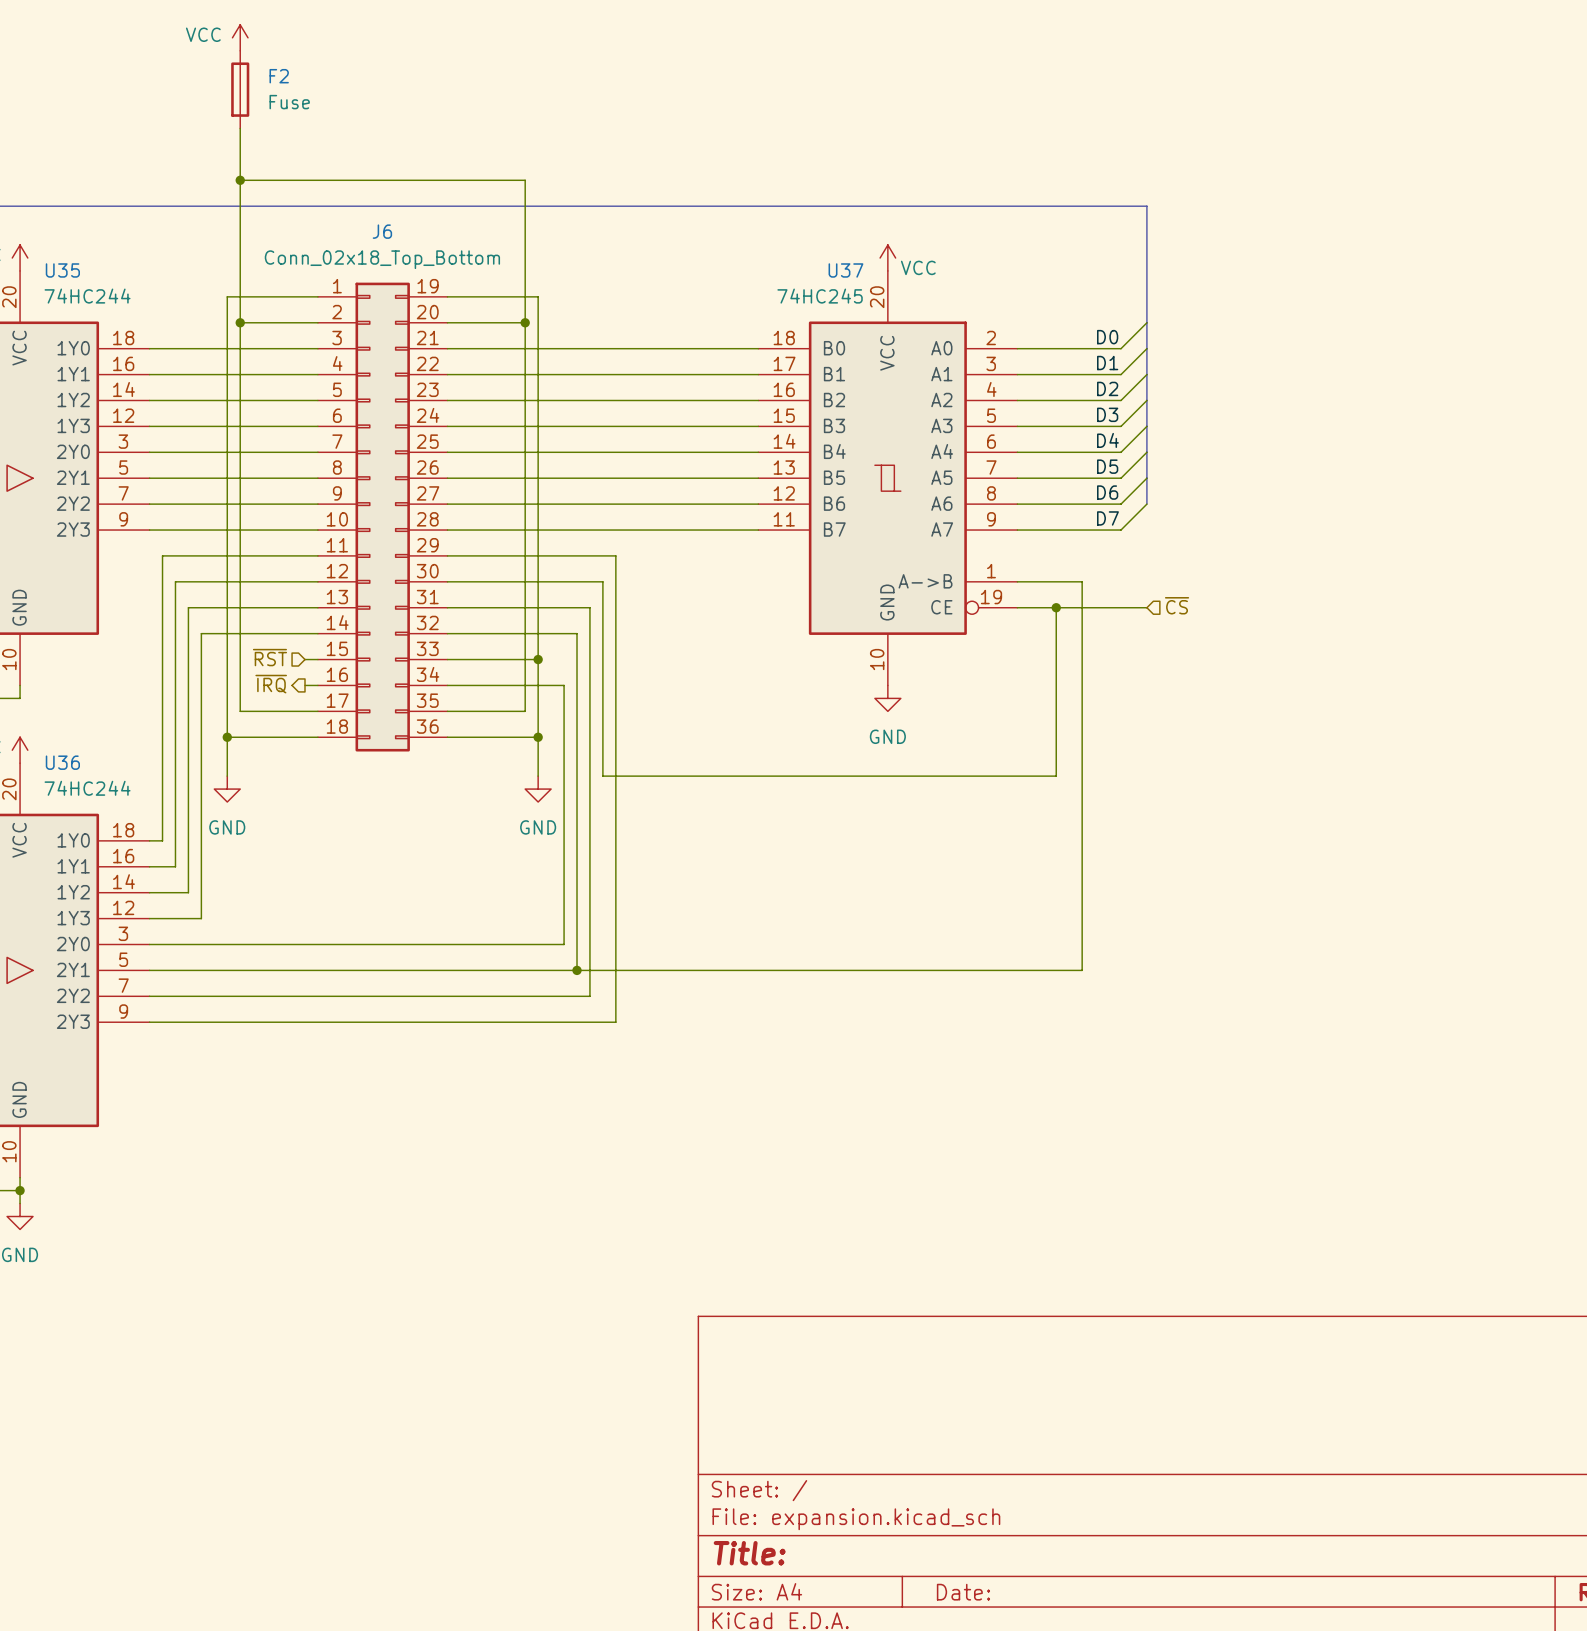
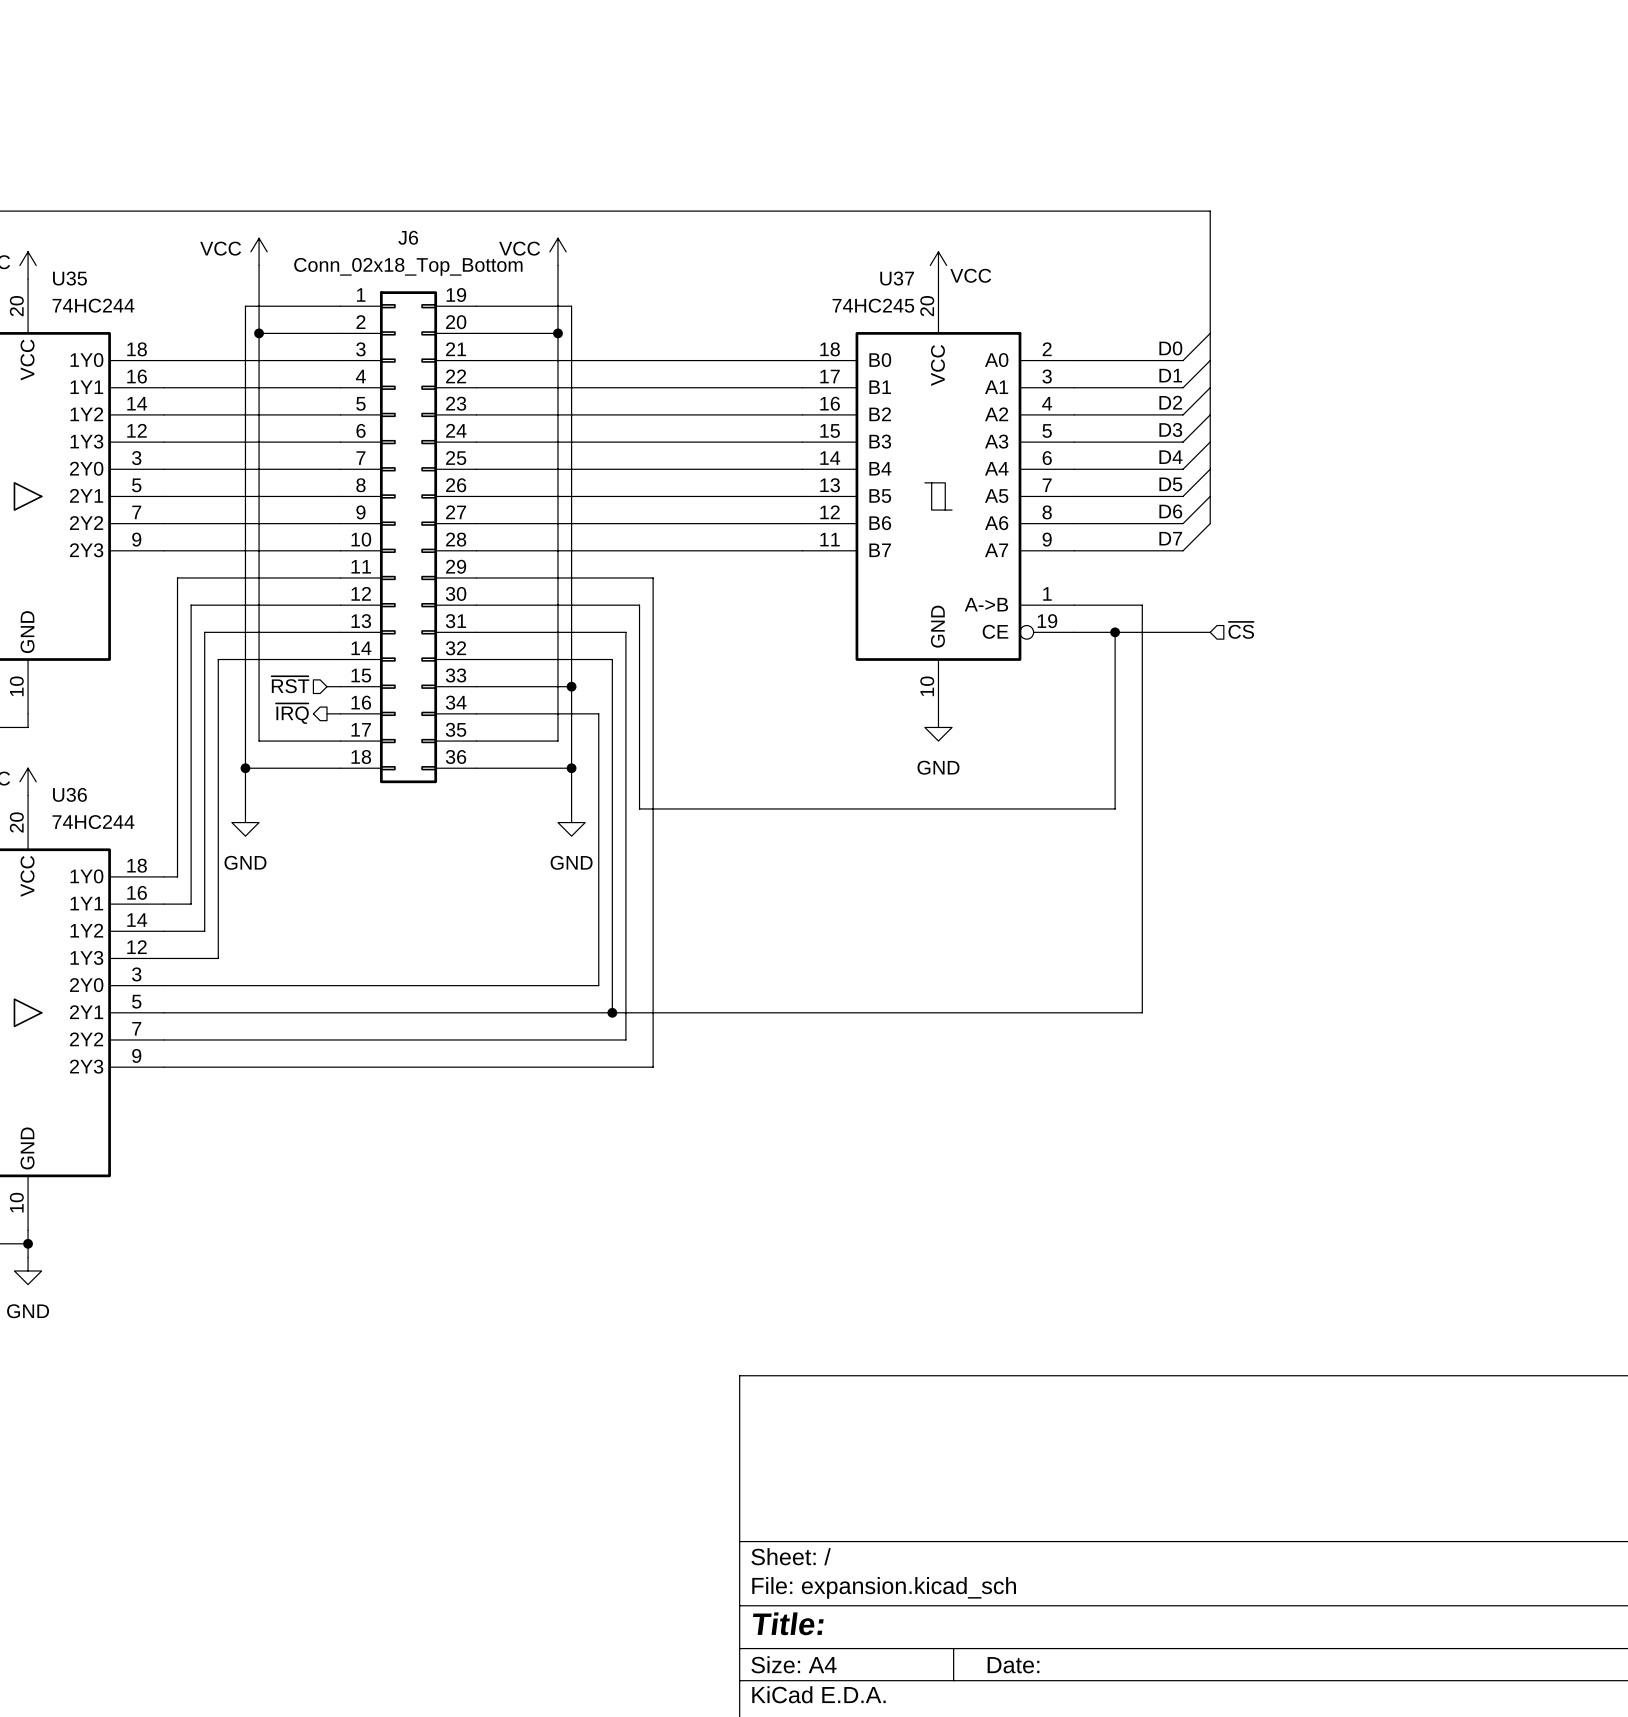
power symbol: VCC (240, 37) -> none
F2: Fuse (240, 89) -> none
wire: (240, 128) (240, 258) -> none
wire: (240, 180) (525, 180) (525, 258) -> none
junction: (240, 180) -> none
power symbol: none -> VCC (259, 251)
power symbol: none -> VCC (557, 251)

